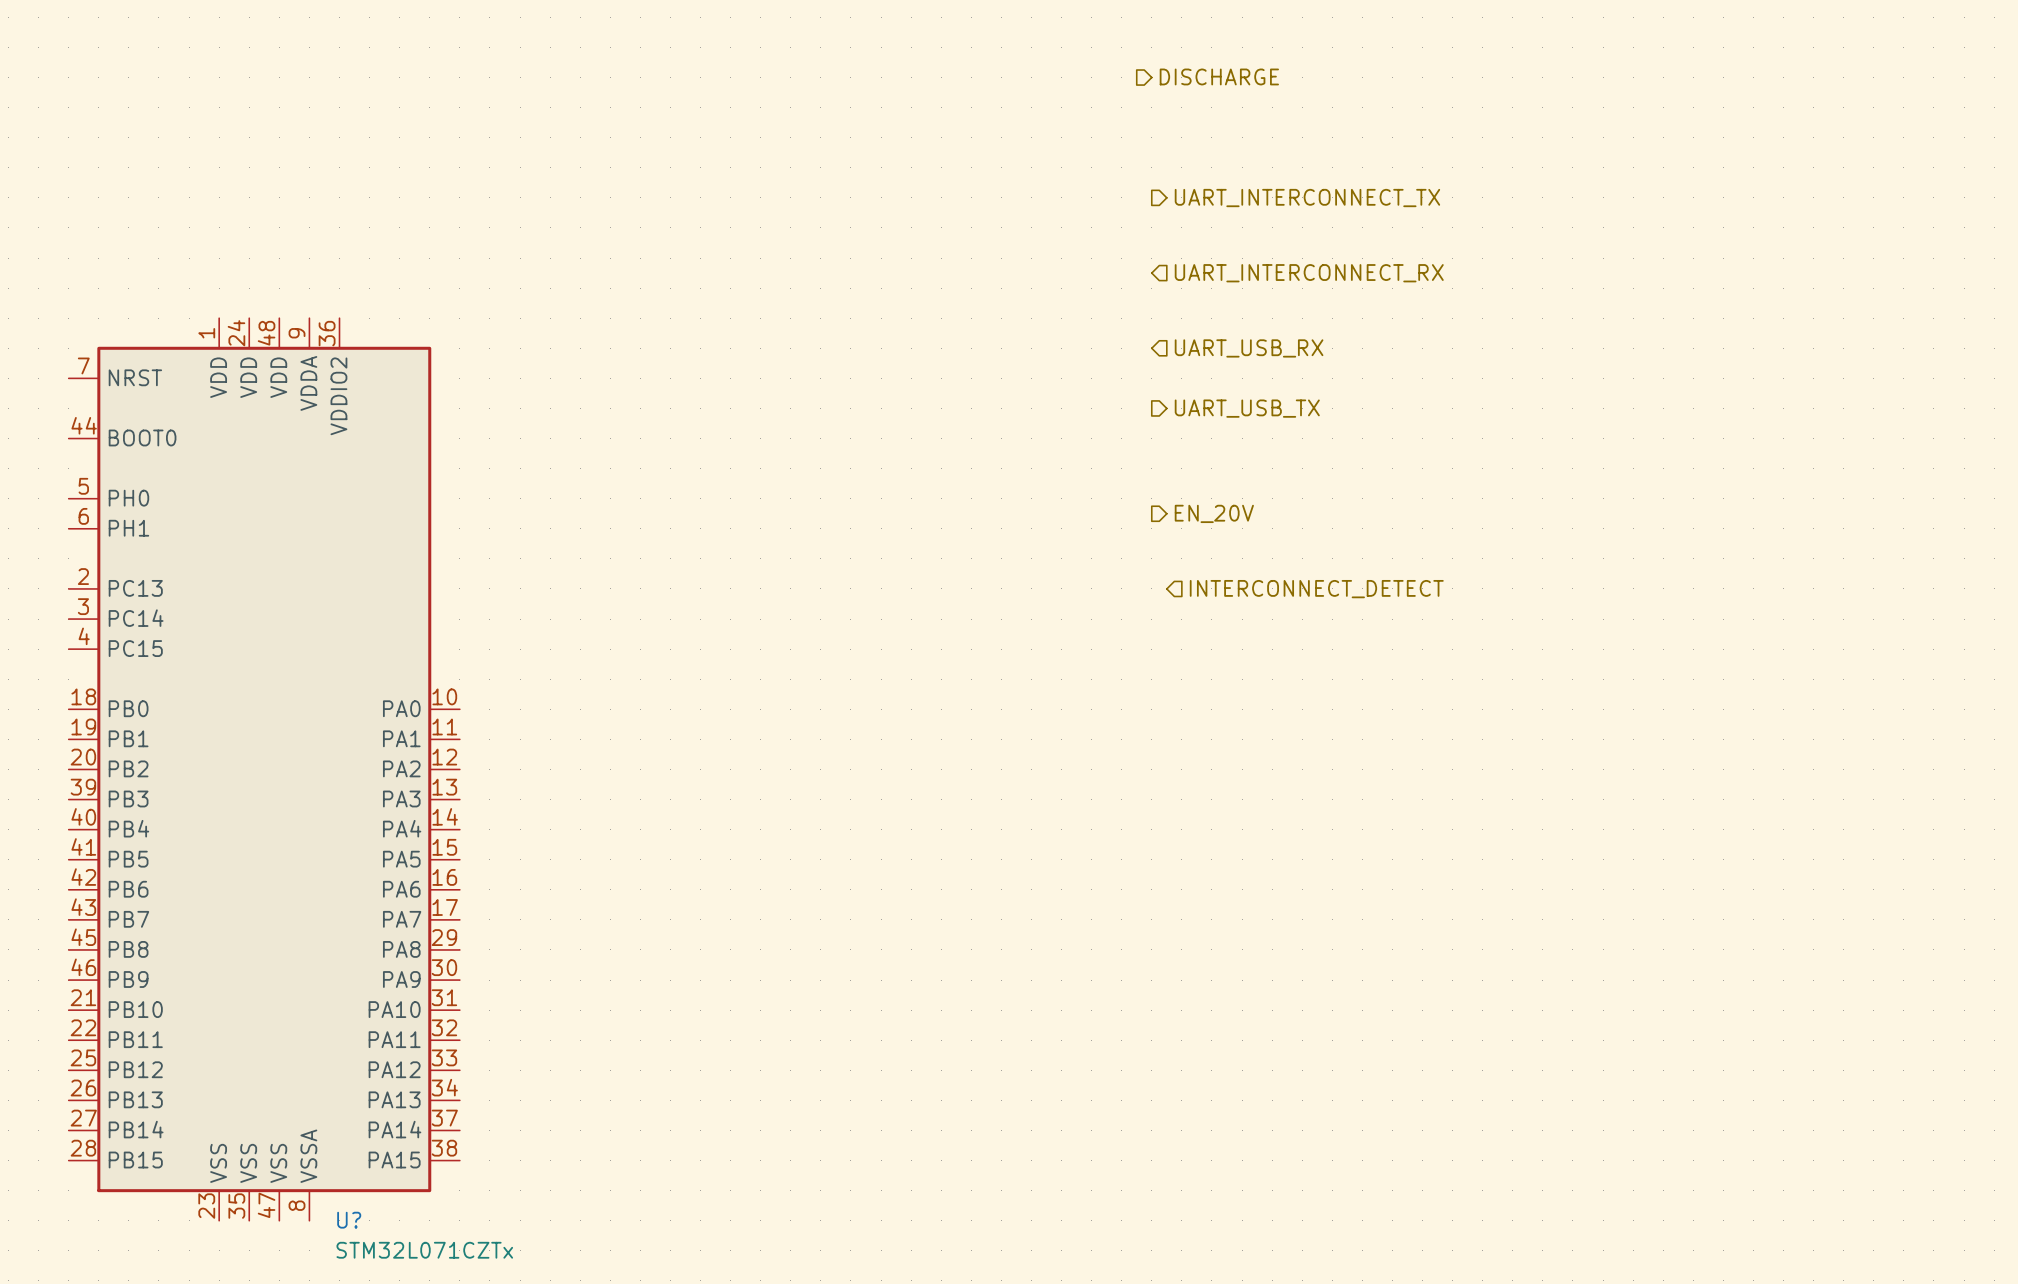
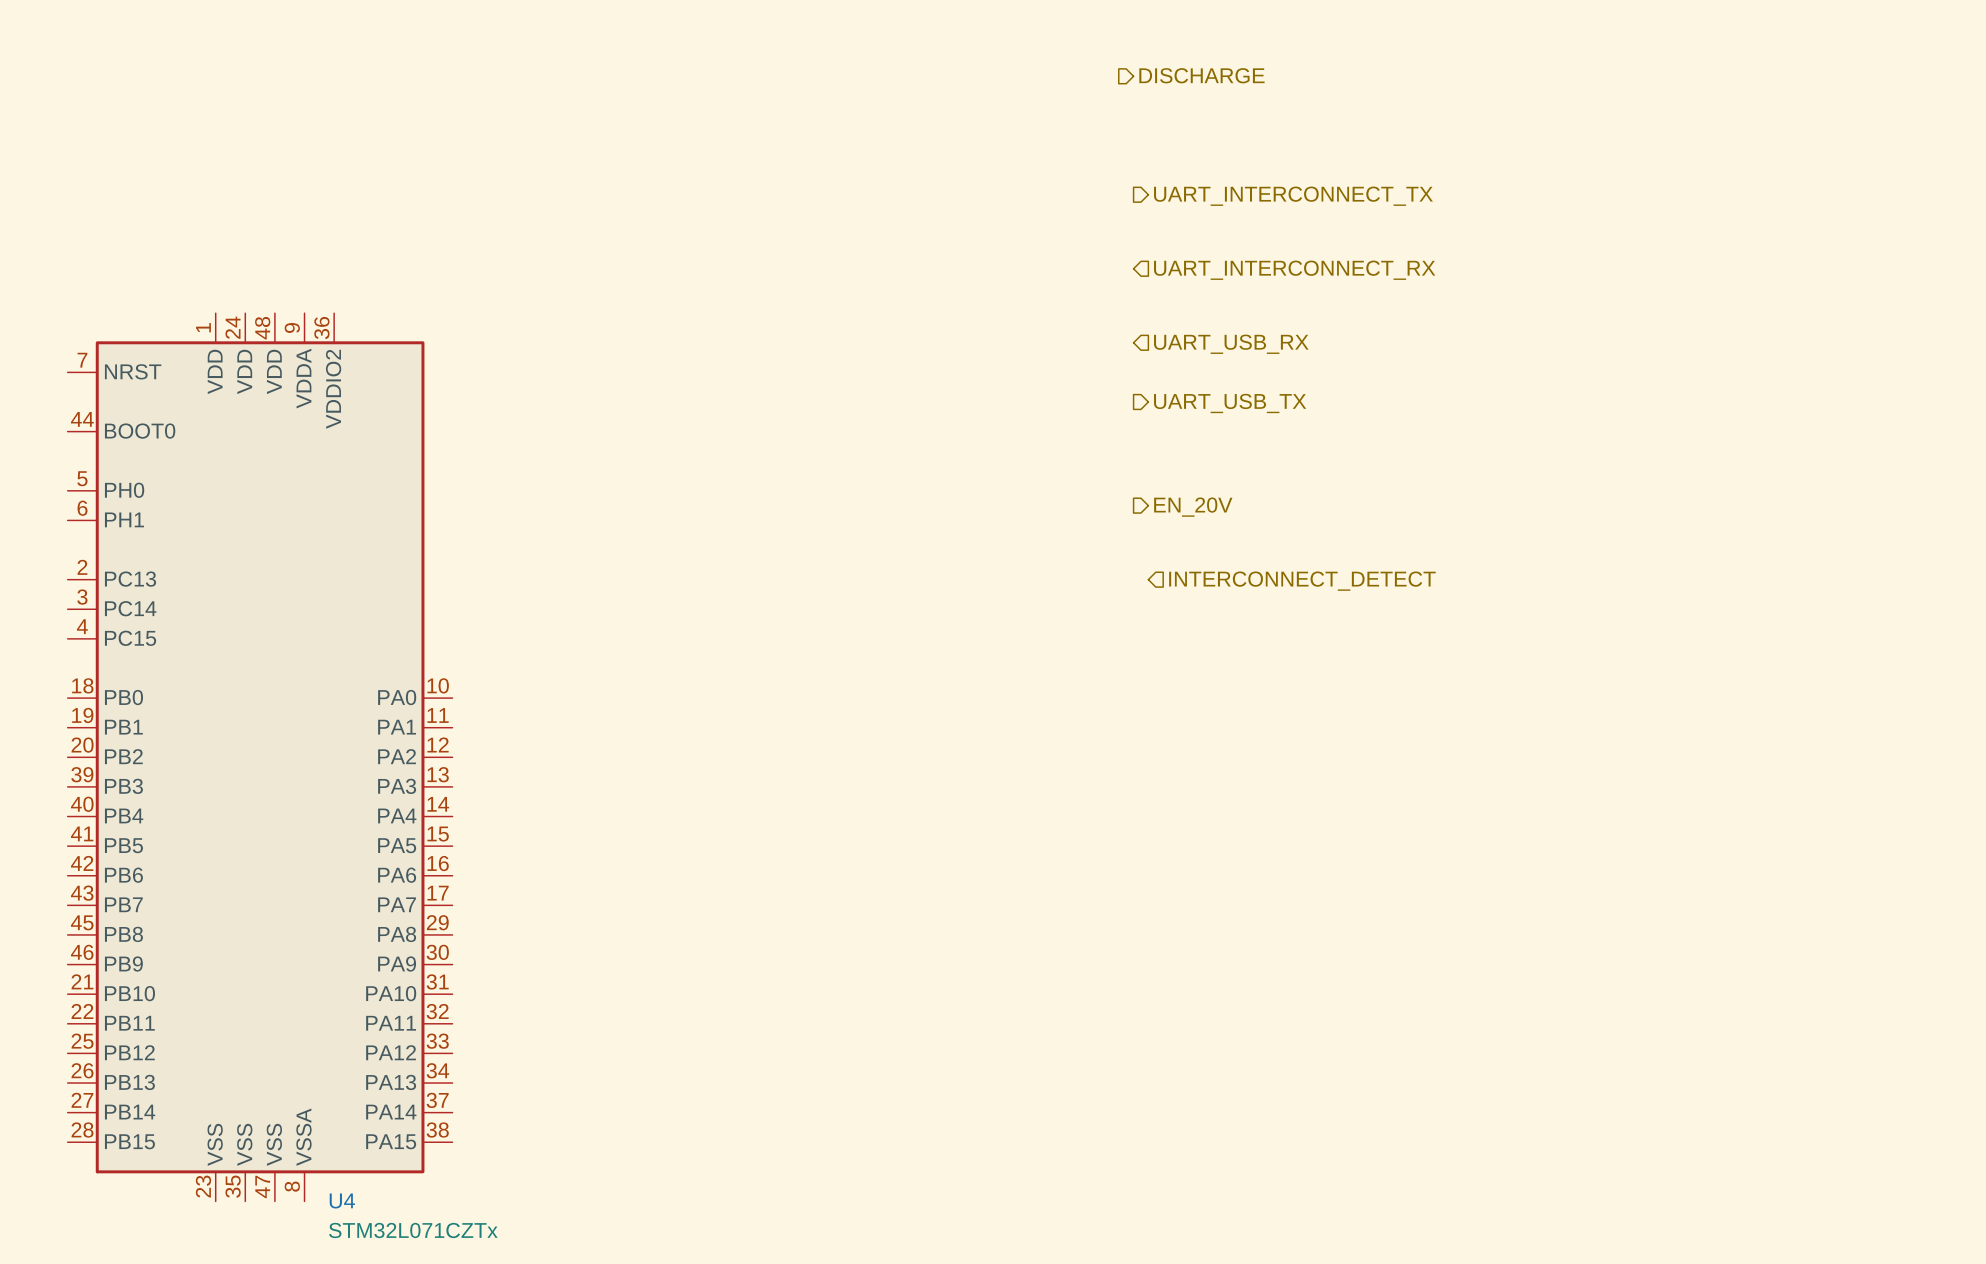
U? name: U? (349, 1220) -> U4 (342, 1200)

